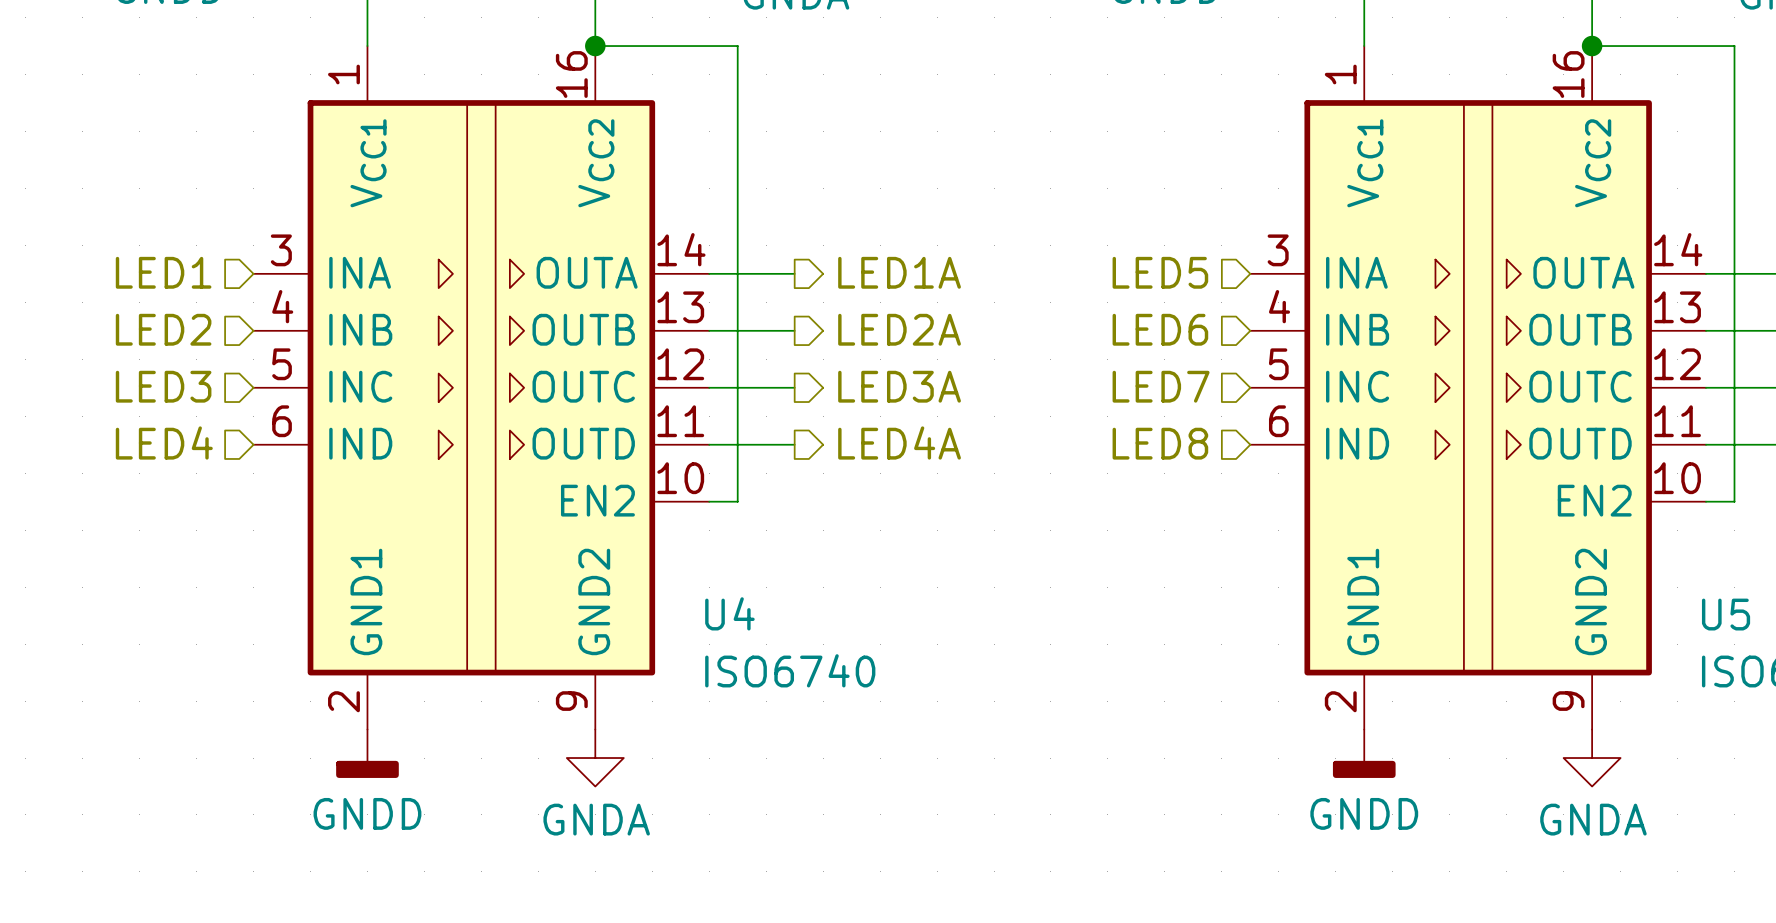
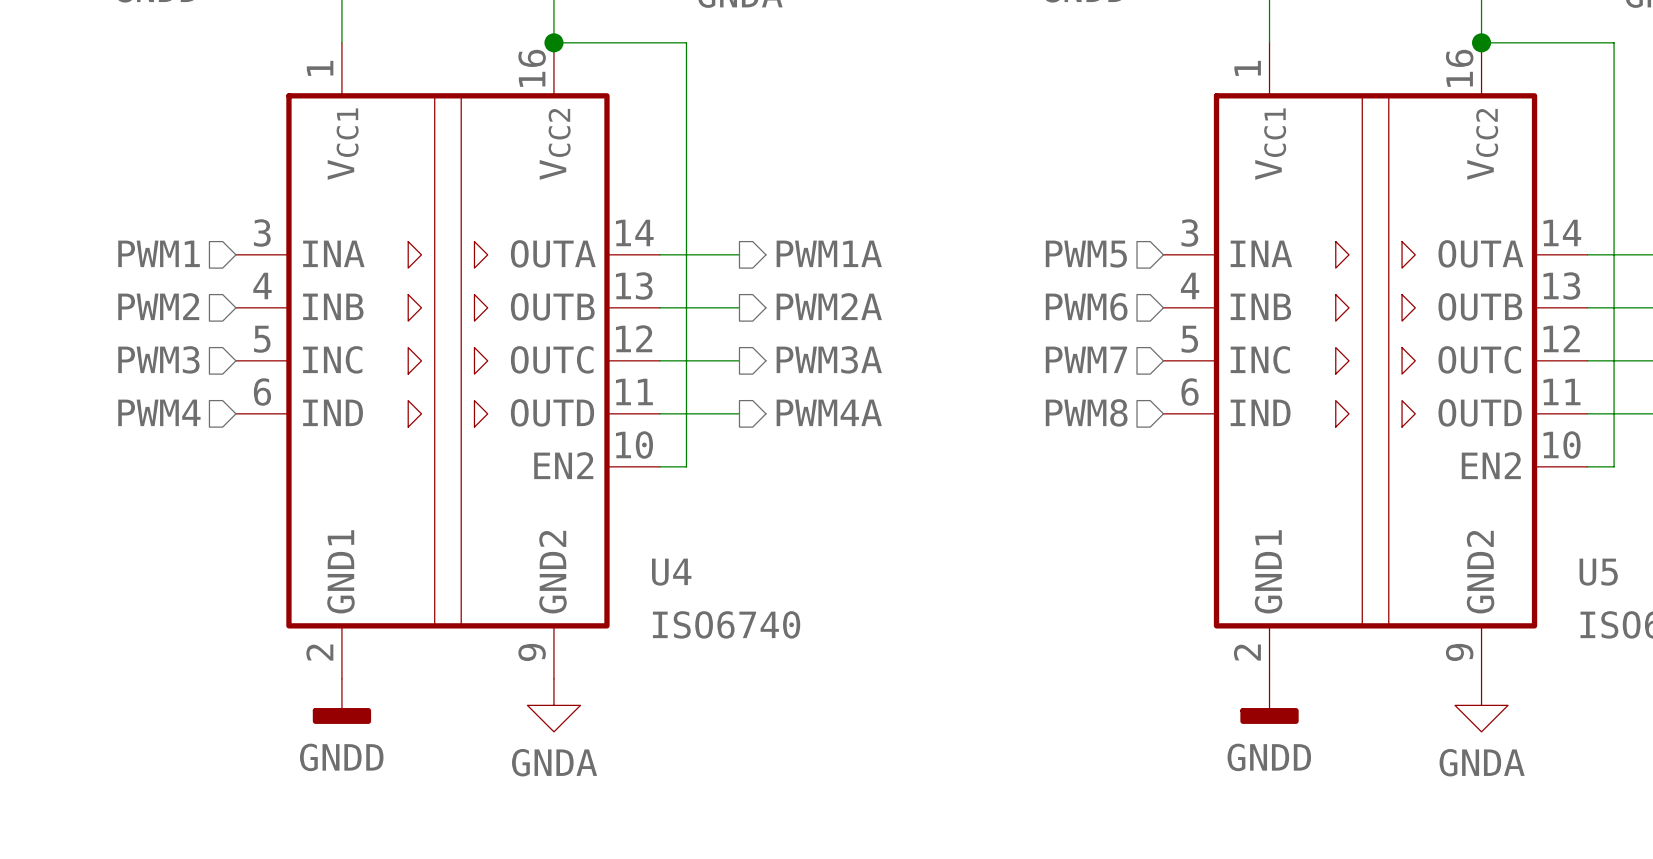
hierarchical label: LED1 (163, 272) -> PWM1 (159, 253)
hierarchical label: LED1A (899, 272) -> PWM1A (829, 253)
hierarchical label: LED5 (1160, 272) -> PWM5 (1086, 254)
hierarchical label: LED2 (163, 329) -> PWM2 (158, 306)
hierarchical label: LED2A (899, 329) -> PWM2A (829, 306)
hierarchical label: LED6 (1160, 329) -> PWM6 (1086, 306)
hierarchical label: LED3 (163, 386) -> PWM3 (158, 359)
hierarchical label: LED3A (899, 386) -> PWM3A (829, 359)
hierarchical label: LED7 (1161, 386) -> PWM7 (1086, 359)
hierarchical label: LED4 (164, 442) -> PWM4 (159, 412)
hierarchical label: LED4A (899, 442) -> PWM4A (829, 412)
hierarchical label: LED8 (1160, 443) -> PWM8 (1086, 412)

